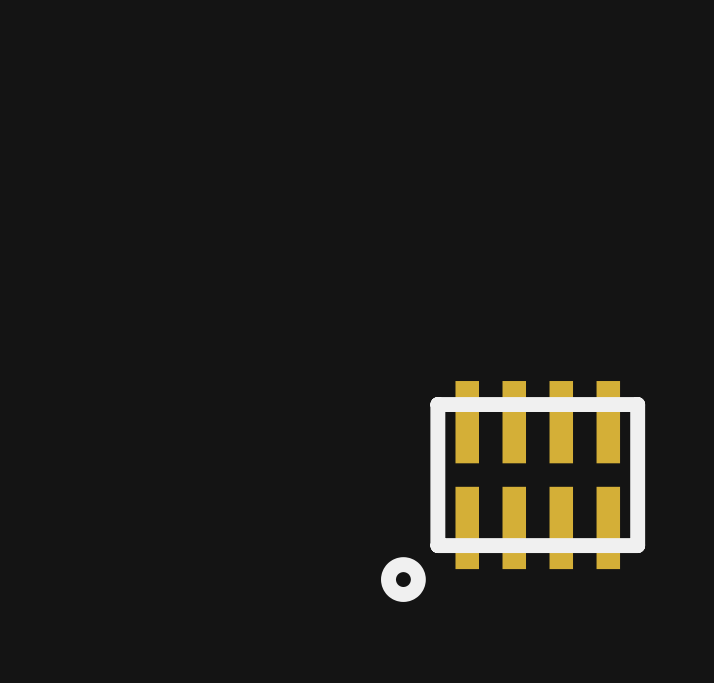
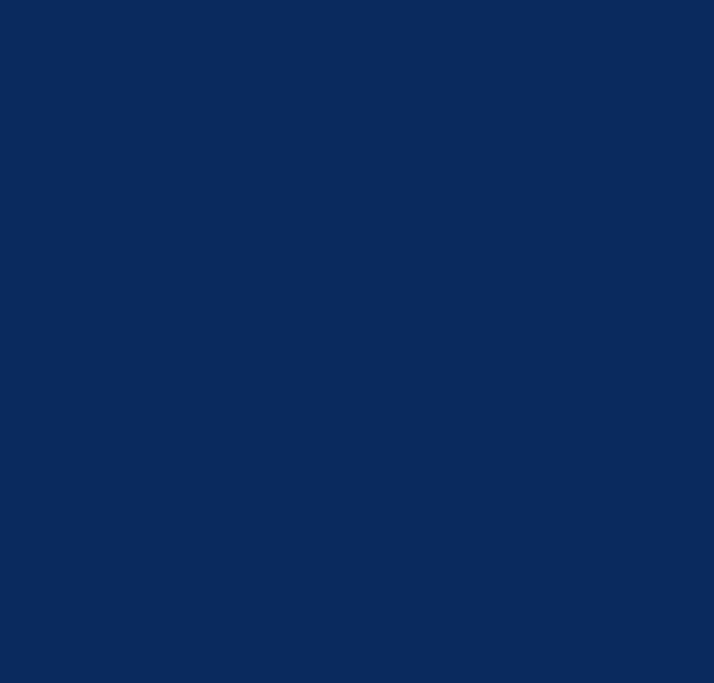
part: (513, 491) -> none

